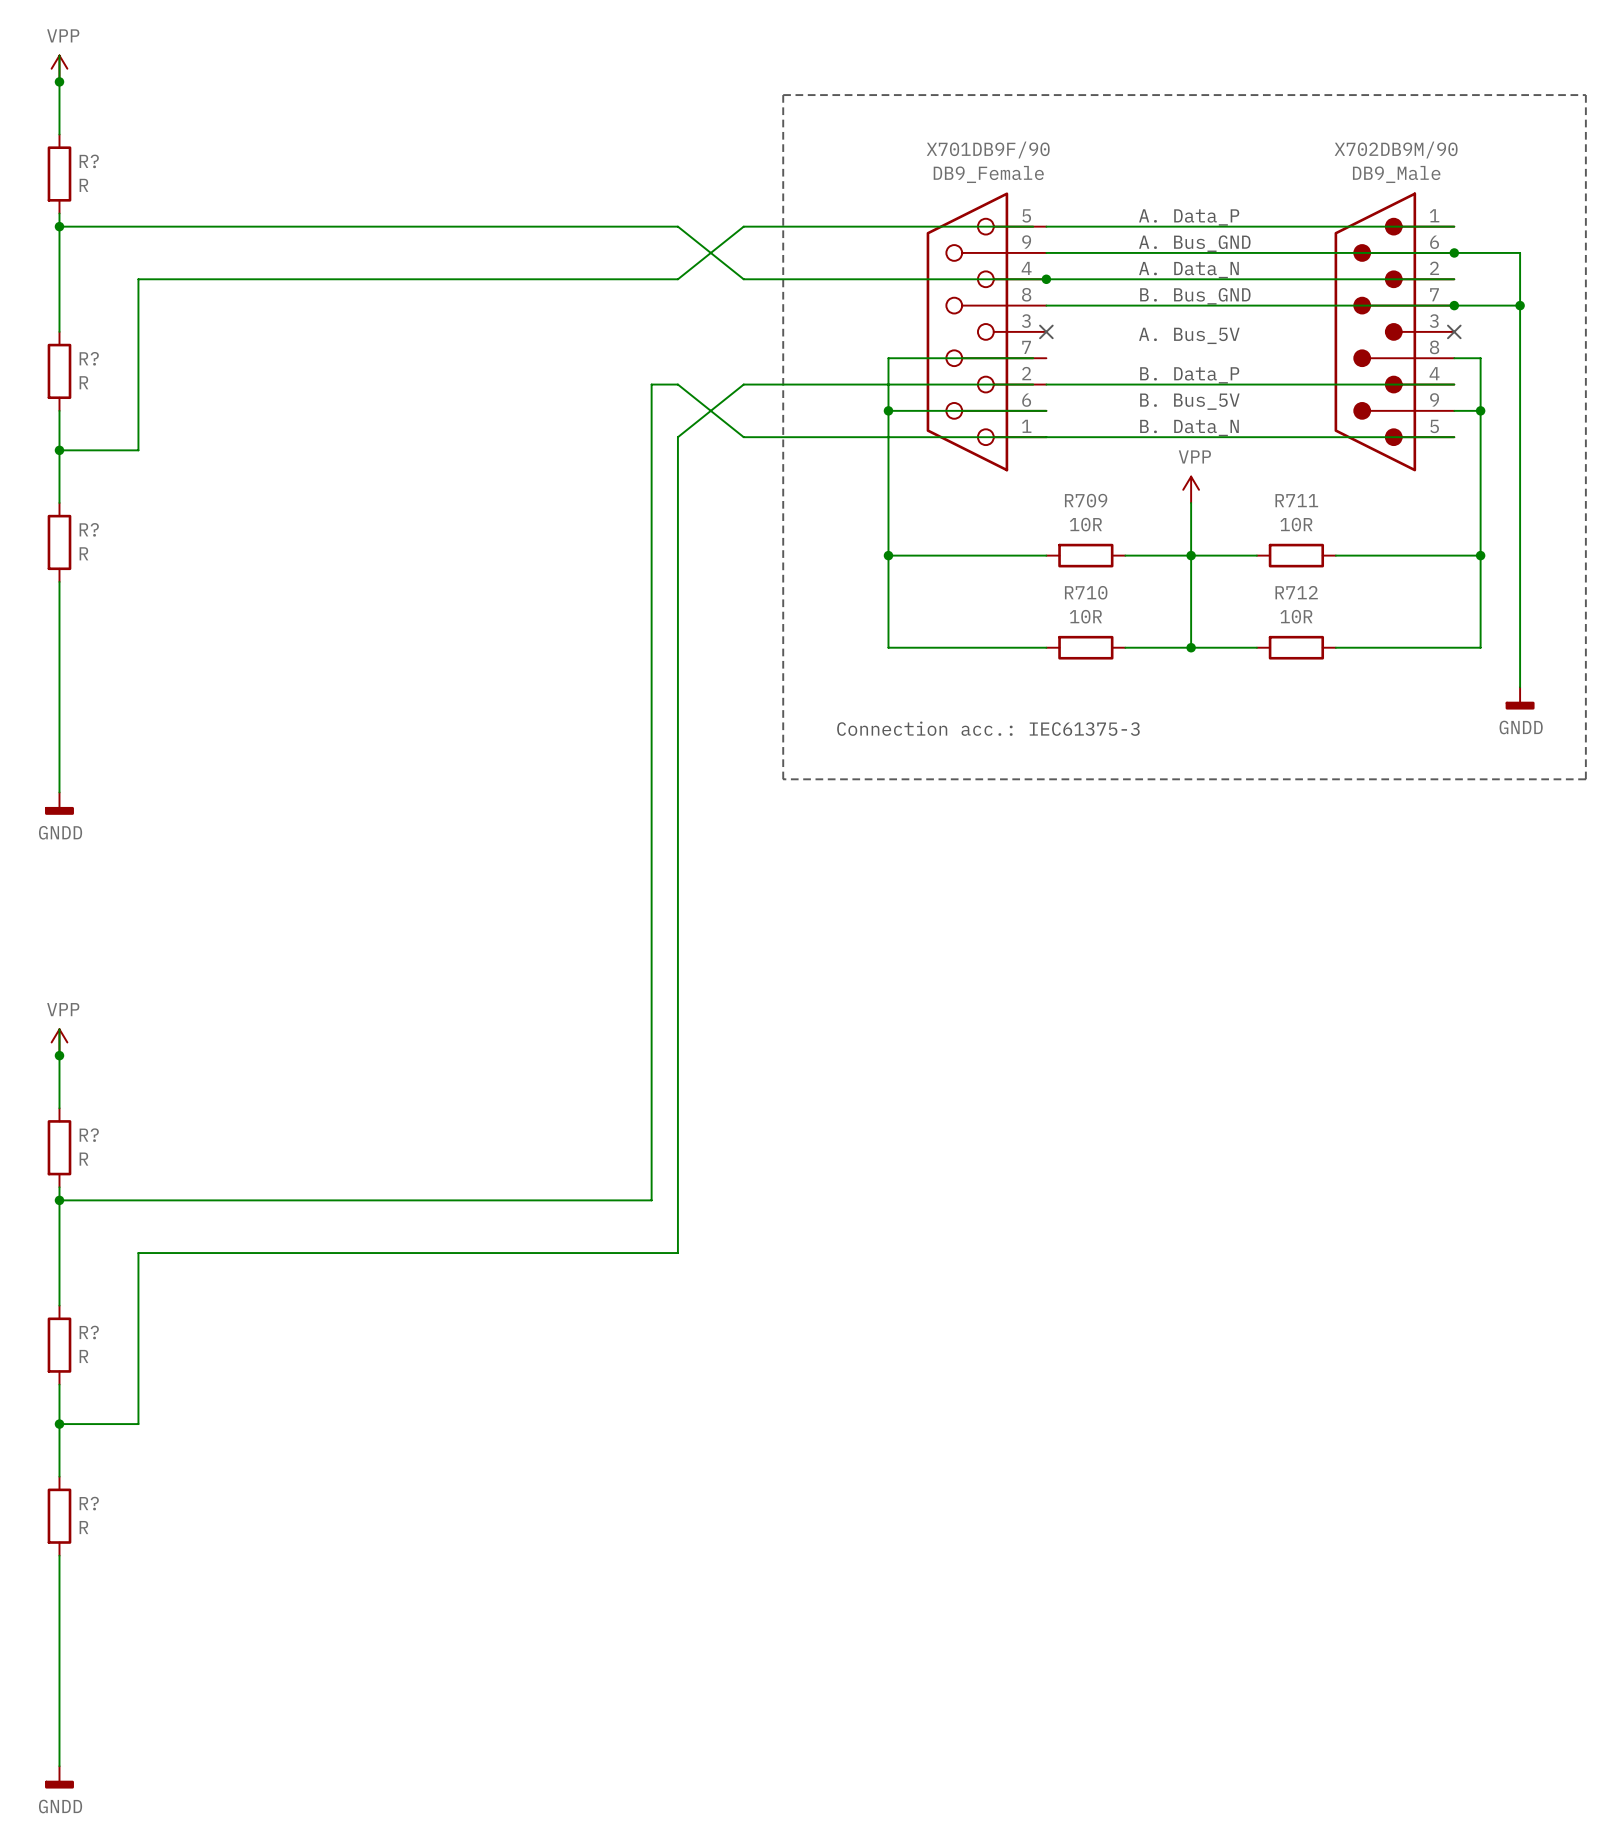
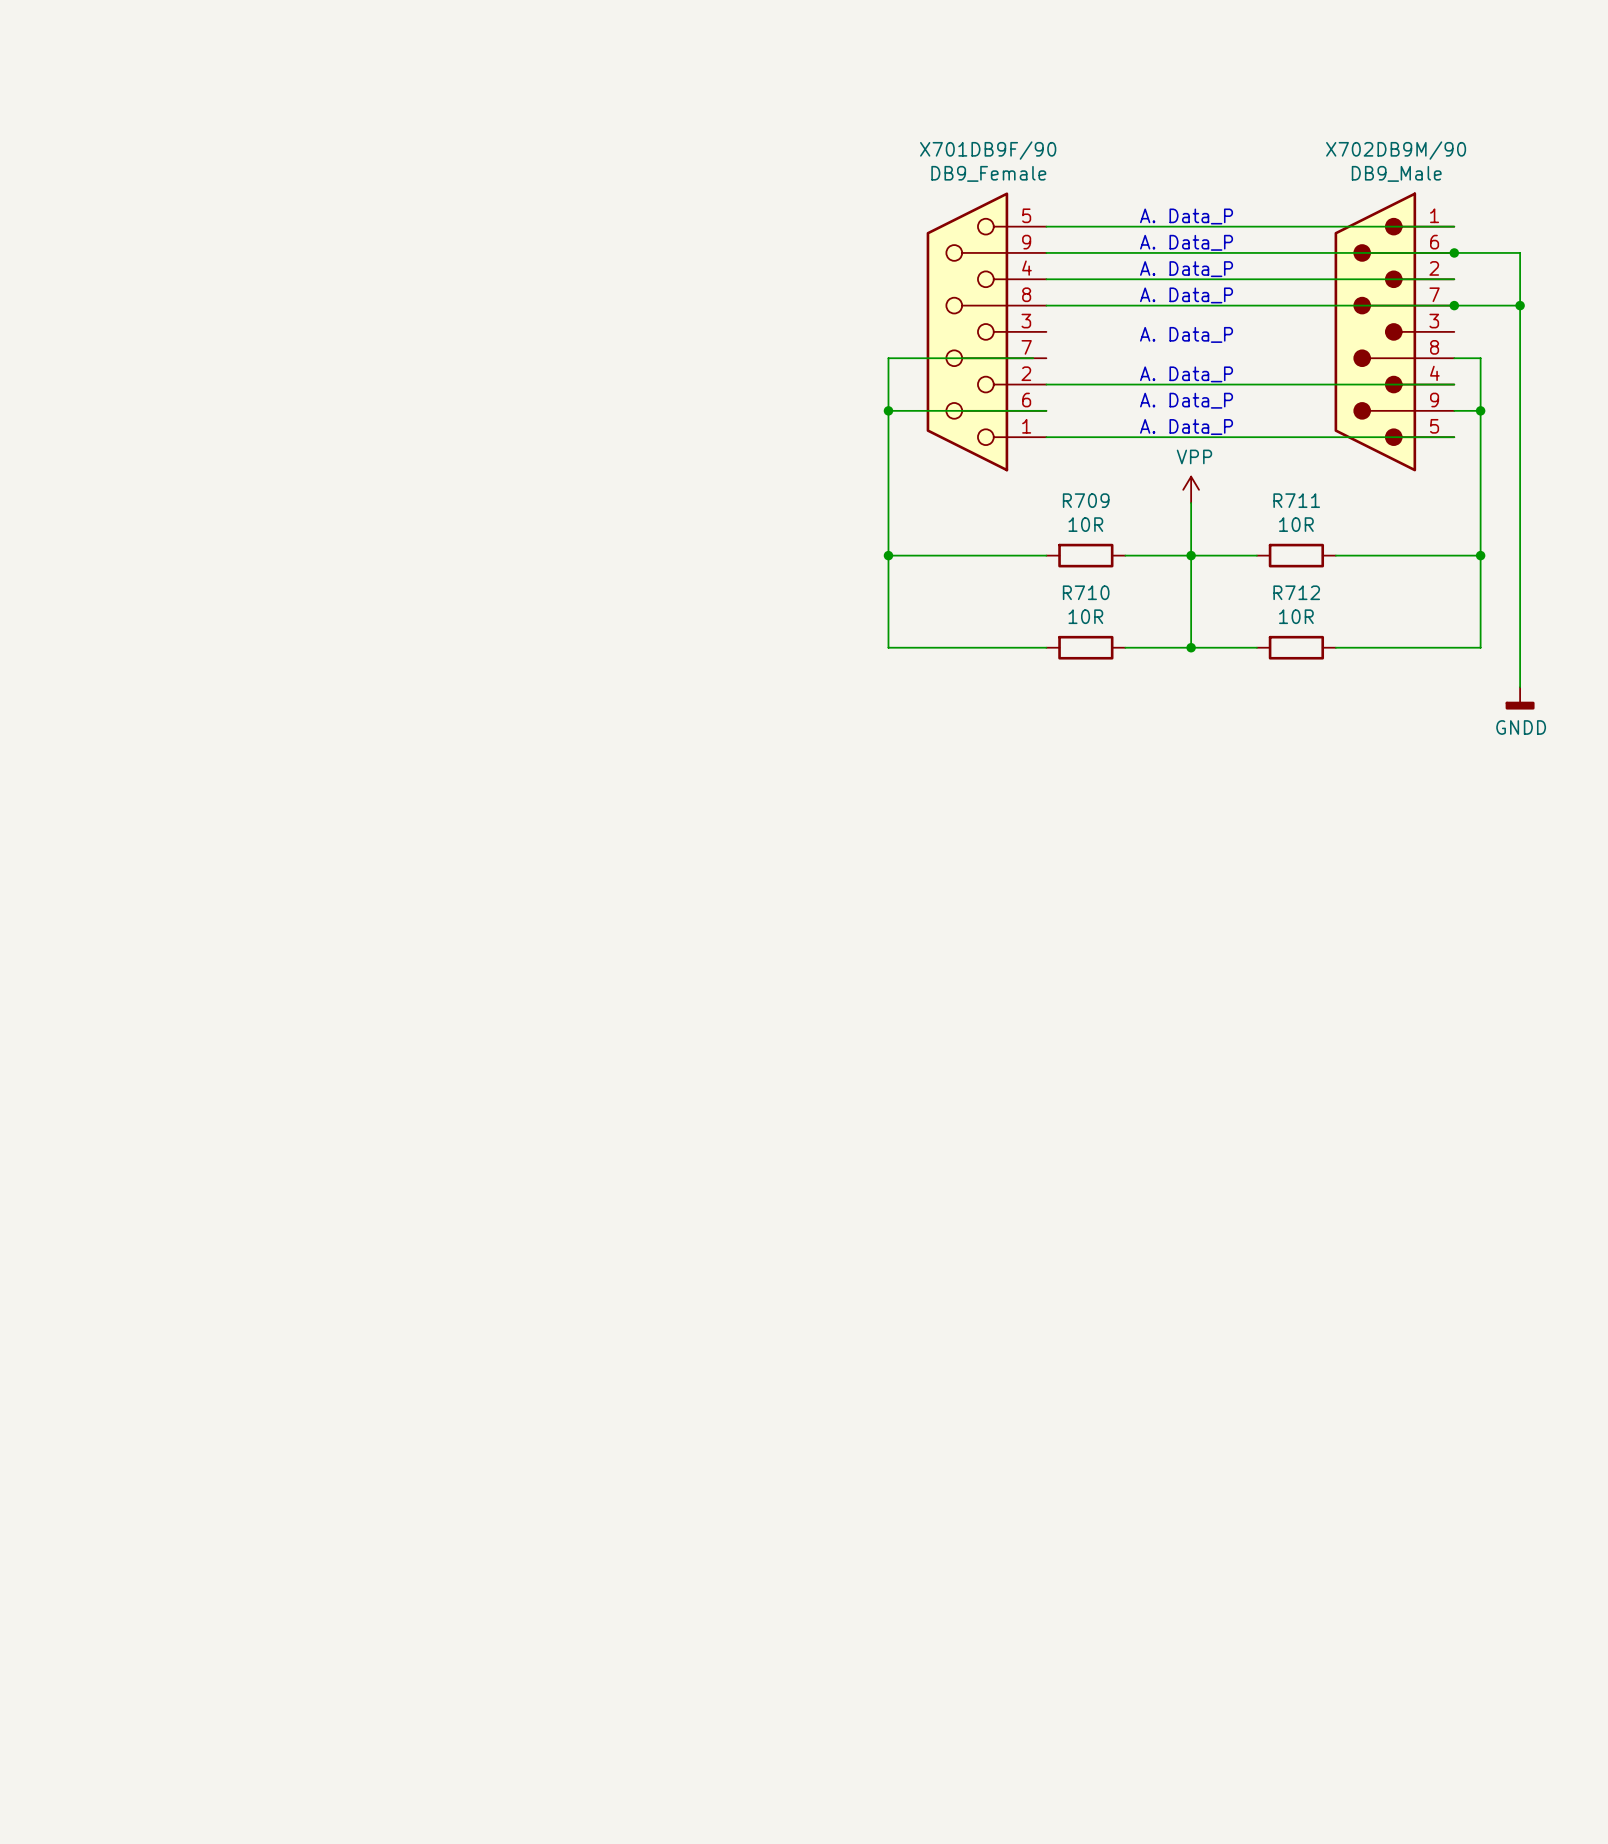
wire: (59, 55) (59, 134) -> none
power symbol: VPP (59, 68) -> none
junction: (59, 81) -> none
line: (783, 95) (1585, 95) (1585, 779) (783, 779) (783, 95) -> none
R?: R (59, 174) -> none
wire: (59, 213) (59, 331) -> none
wire: (59, 226) (677, 226) (743, 279) (1046, 279) -> none
junction: (59, 226) -> none
wire: (1033, 226) (743, 226) (677, 279) (138, 279) (138, 450) (59, 450) -> none
text: A. Bus_GND (1194, 243) -> A. Data_P (1186, 242)
text: A. Data_N (1188, 270) -> A. Data_P (1186, 269)
junction: (1046, 279) -> none
text: B. Bus_GND (1195, 296) -> A. Data_P (1186, 295)
no-connect mark: (1046, 331) -> none
no-connect mark: (1454, 331) -> none
text: A. Bus_5V (1189, 335) -> A. Data_P (1186, 334)
R?: R (59, 371) -> none
text: B. Data_P (1189, 375) -> A. Data_P (1186, 374)
wire: (1033, 384) (743, 384) (677, 437) (677, 1253) (138, 1253) (138, 1424) (59, 1424) -> none
text: B. Bus_5V (1189, 401) -> A. Data_P (1186, 400)
wire: (59, 410) (59, 502) -> none
text: B. Data_N (1189, 428) -> A. Data_P (1186, 427)
wire: (1046, 437) (743, 437) (677, 384) (651, 384) (651, 1200) (59, 1200) -> none
junction: (59, 450) -> none
R?: R (59, 542) -> none
wire: (59, 581) (59, 792) -> none
text: Connection acc.: IEC61375-3 (988, 728) -> none
power symbol: GNDD (59, 803) -> none
wire: (59, 1029) (59, 1108) -> none
power symbol: VPP (59, 1042) -> none
junction: (59, 1055) -> none
R?: R (59, 1147) -> none
wire: (59, 1187) (59, 1305) -> none
junction: (59, 1200) -> none
R?: R (59, 1345) -> none
wire: (59, 1384) (59, 1476) -> none
junction: (59, 1424) -> none
R?: R (59, 1516) -> none
wire: (59, 1555) (59, 1766) -> none
power symbol: GNDD (59, 1777) -> none

